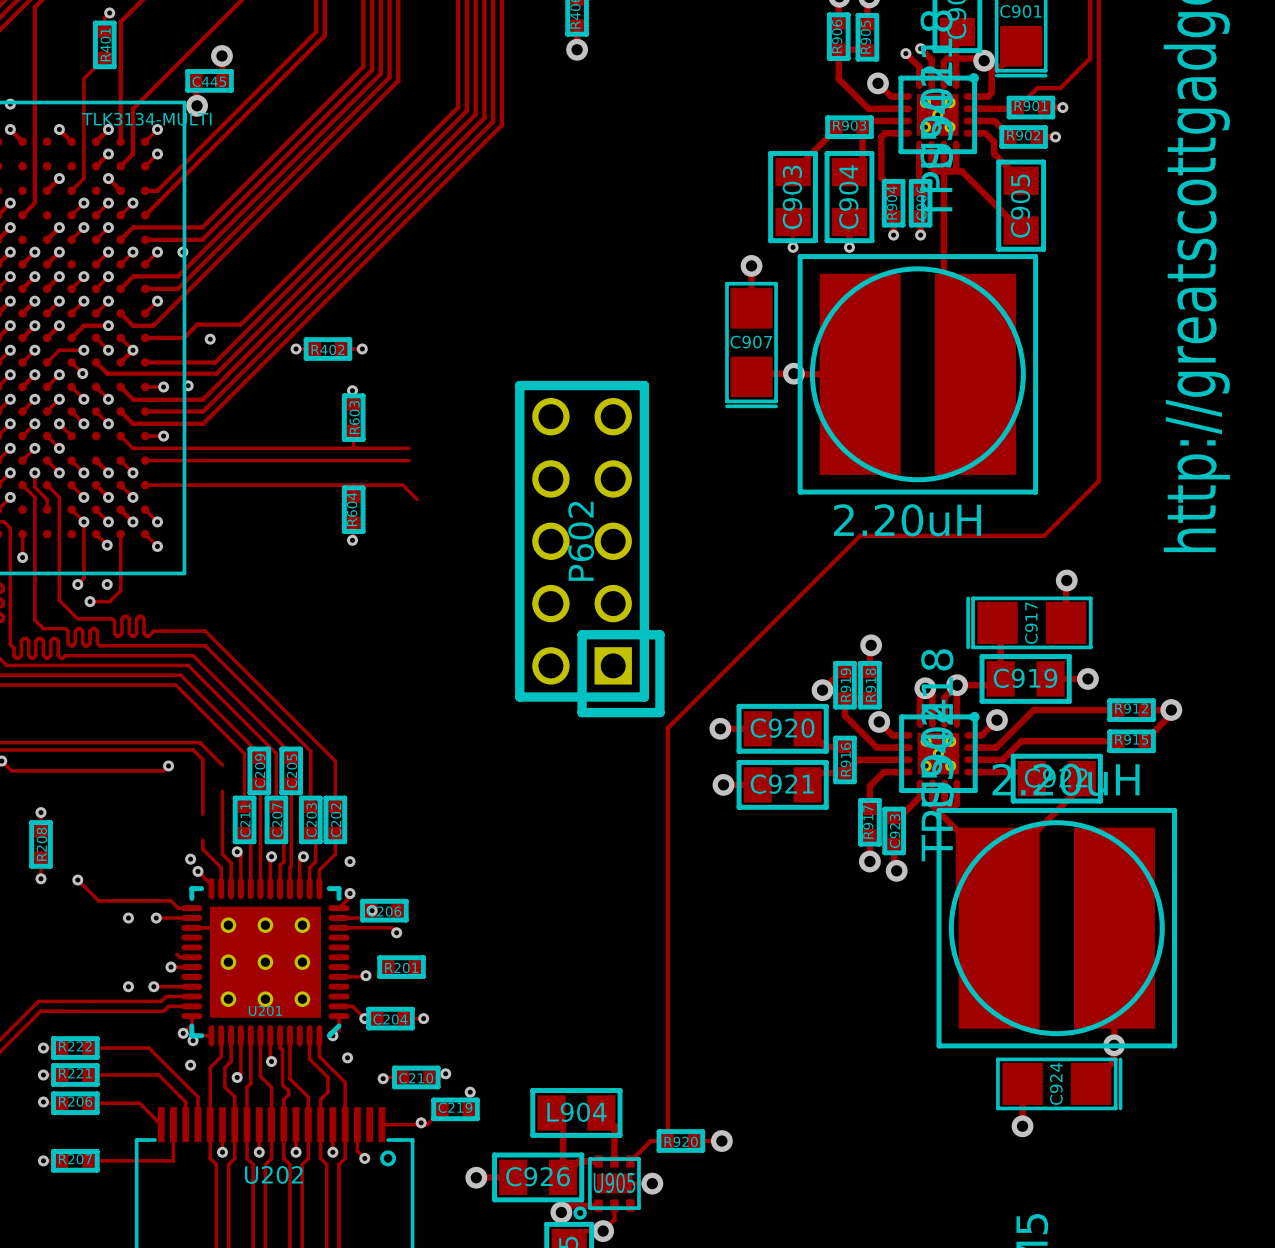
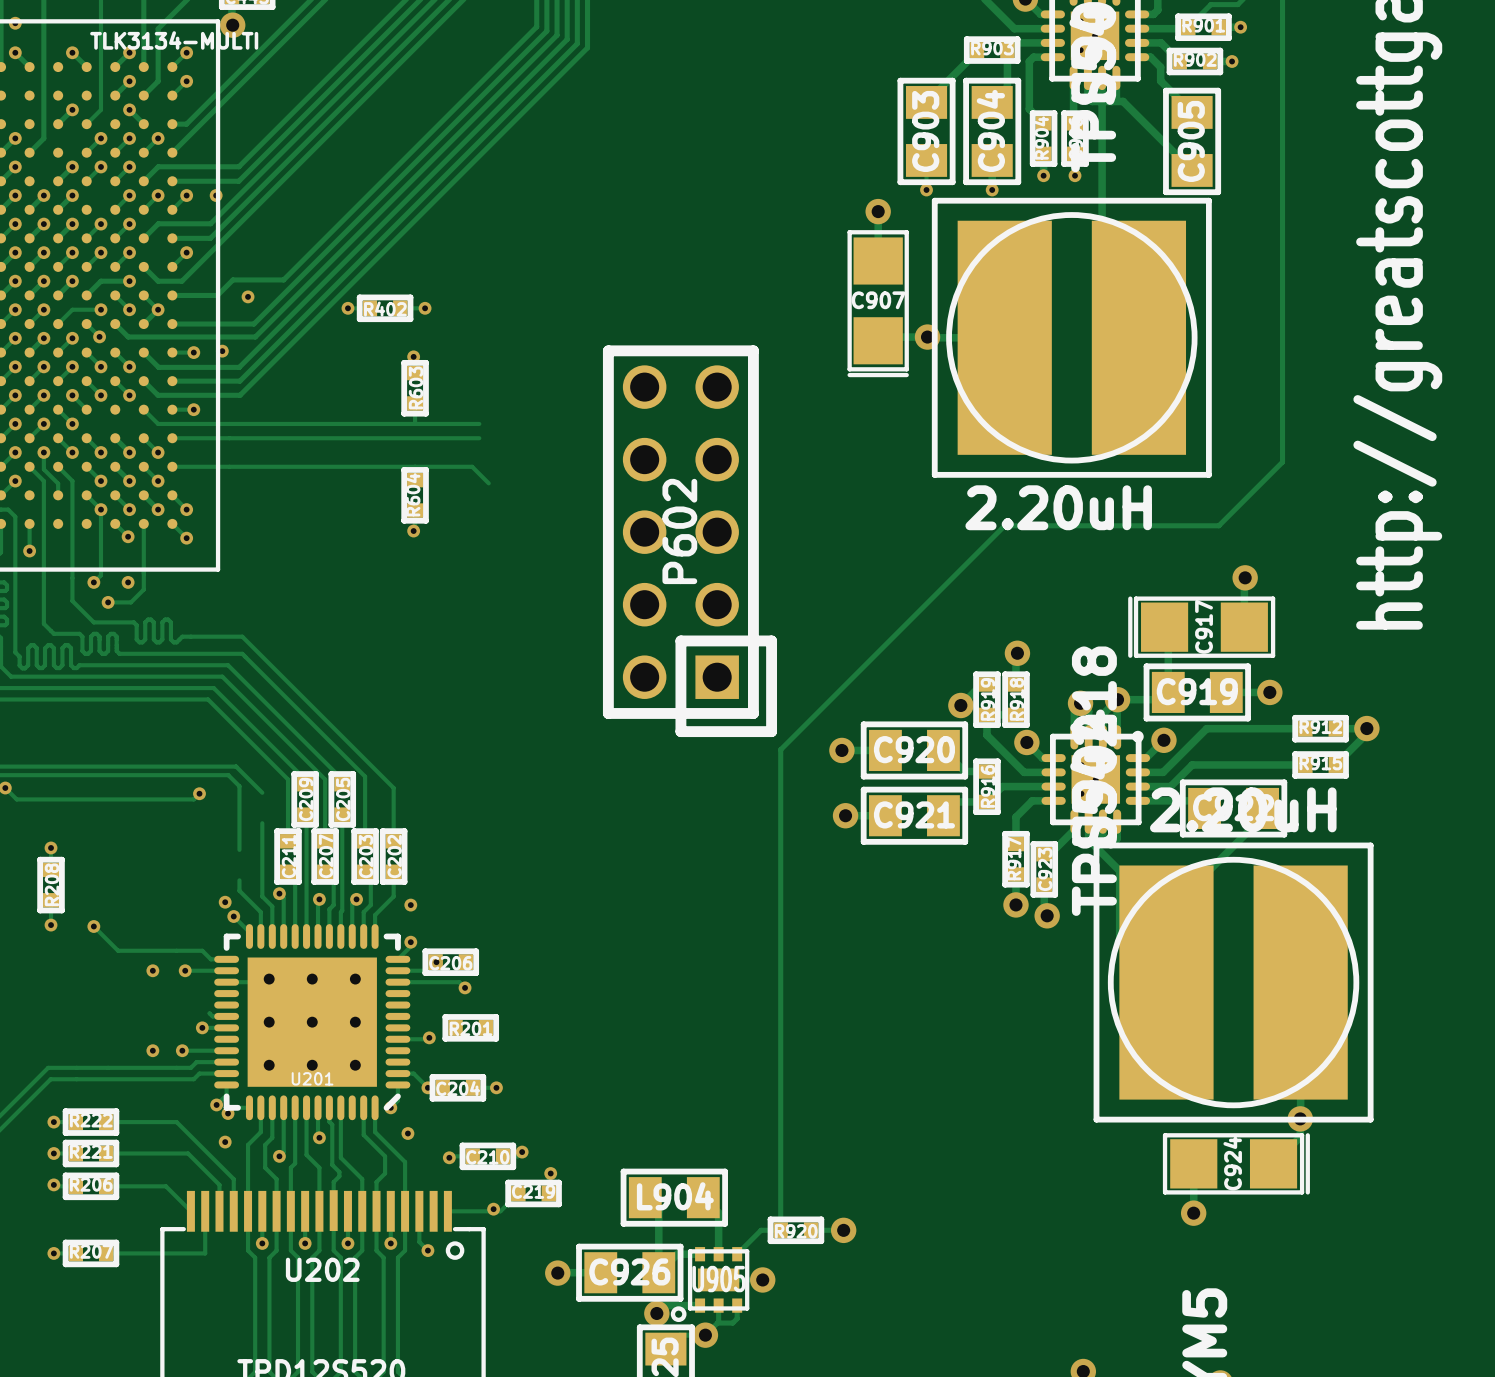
track: none -> (737, 1305) (737, 1318) (732, 1323) (717, 1323)

